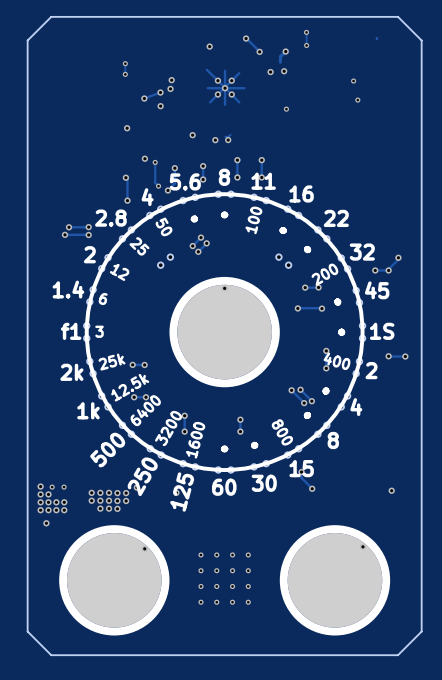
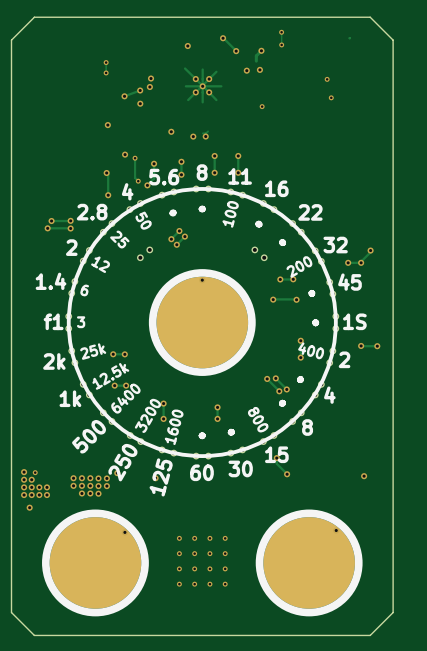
via: (64, 487) -> none

